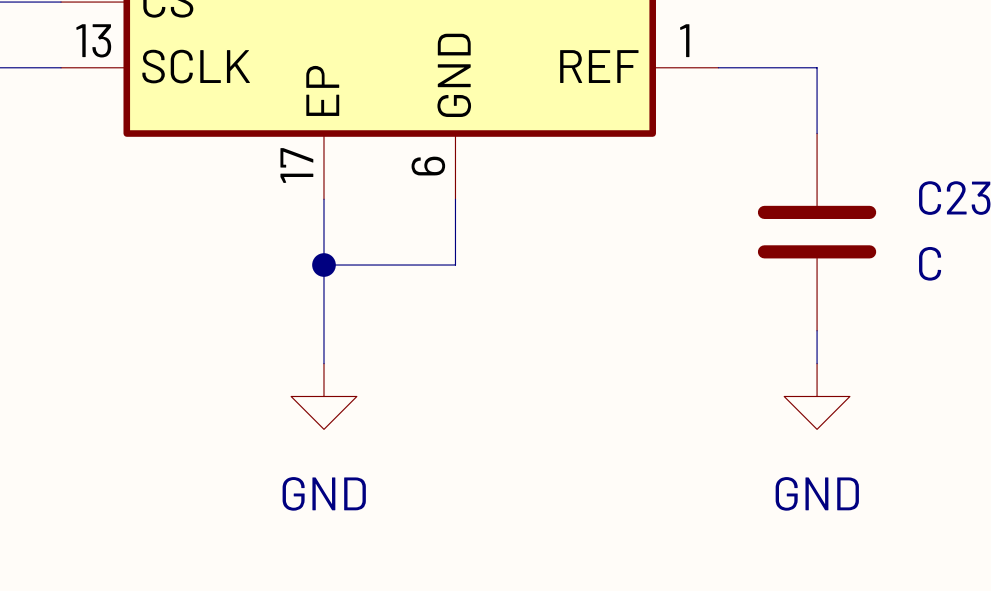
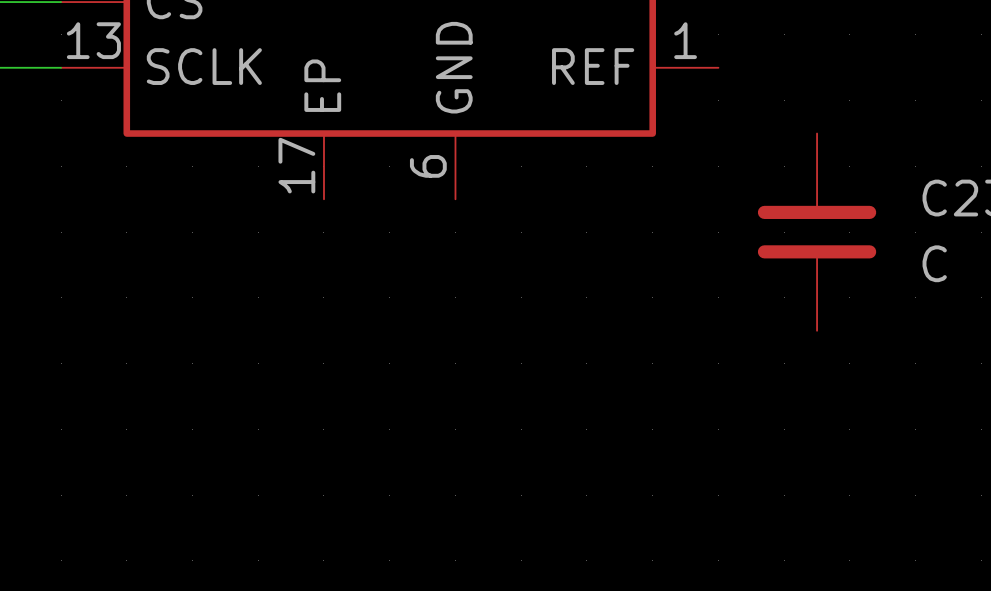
wire: (718, 67) (817, 67) (817, 133) -> none
wire: (323, 199) (323, 363) -> none
wire: (455, 199) (455, 265) (323, 265) -> none
junction: (323, 265) -> none
wire: (817, 330) (817, 363) -> none
power symbol: GND (323, 396) -> none
power symbol: GND (817, 396) -> none

